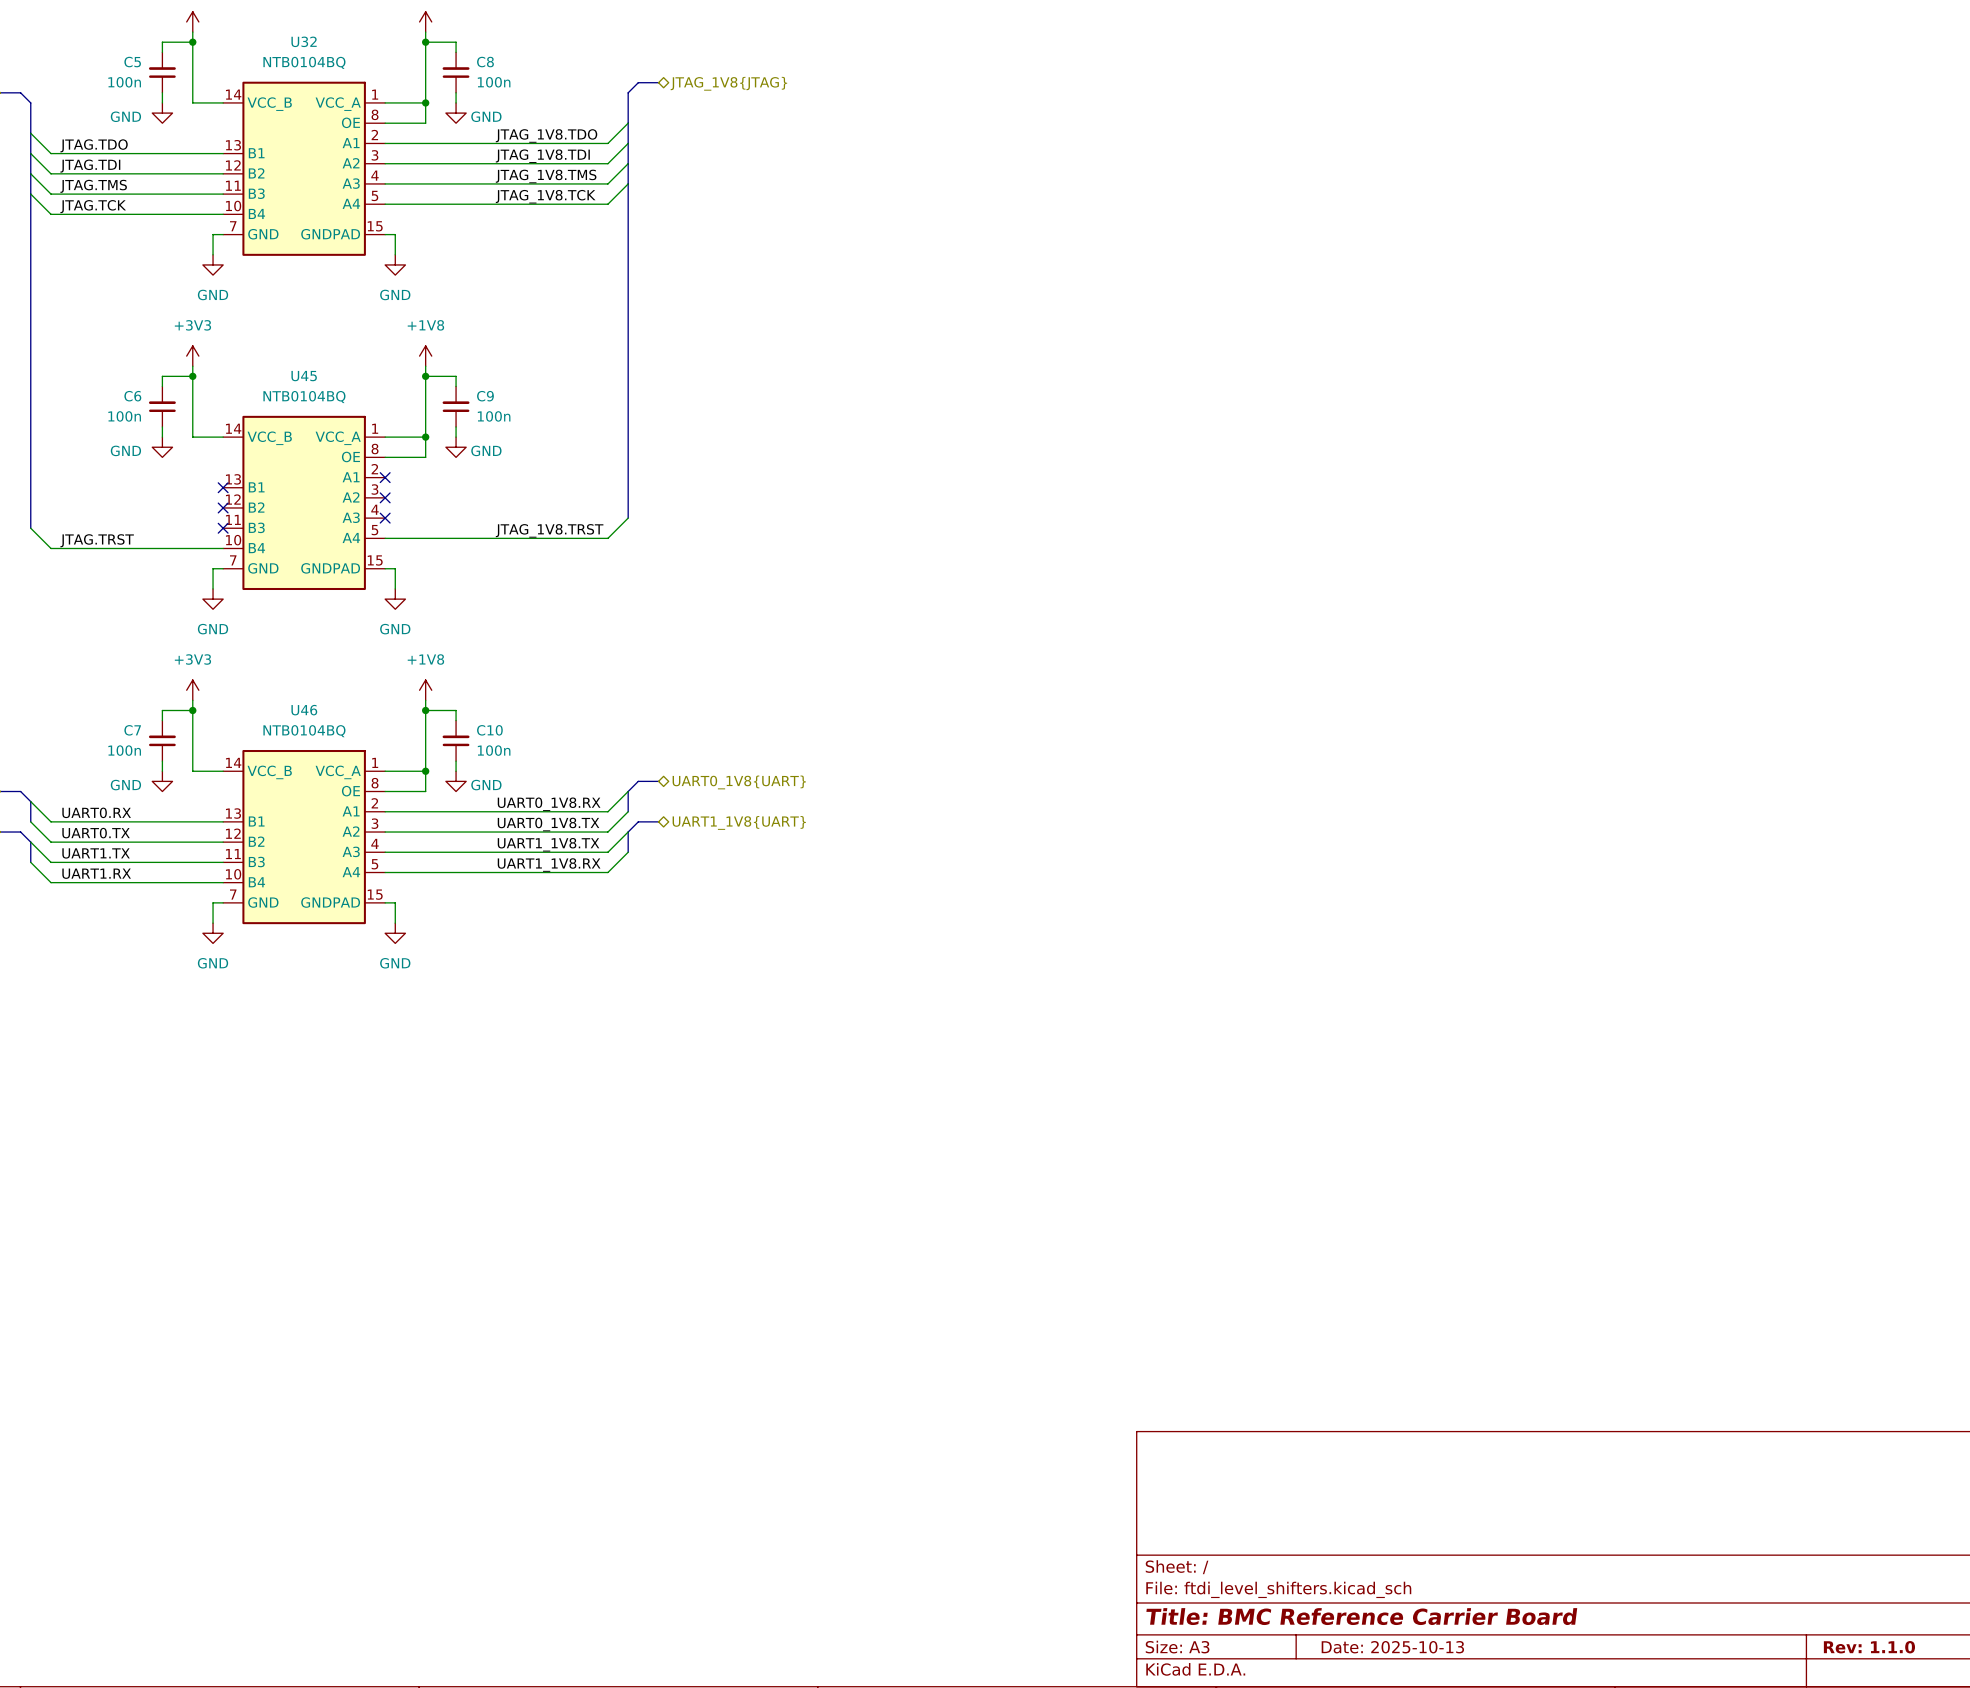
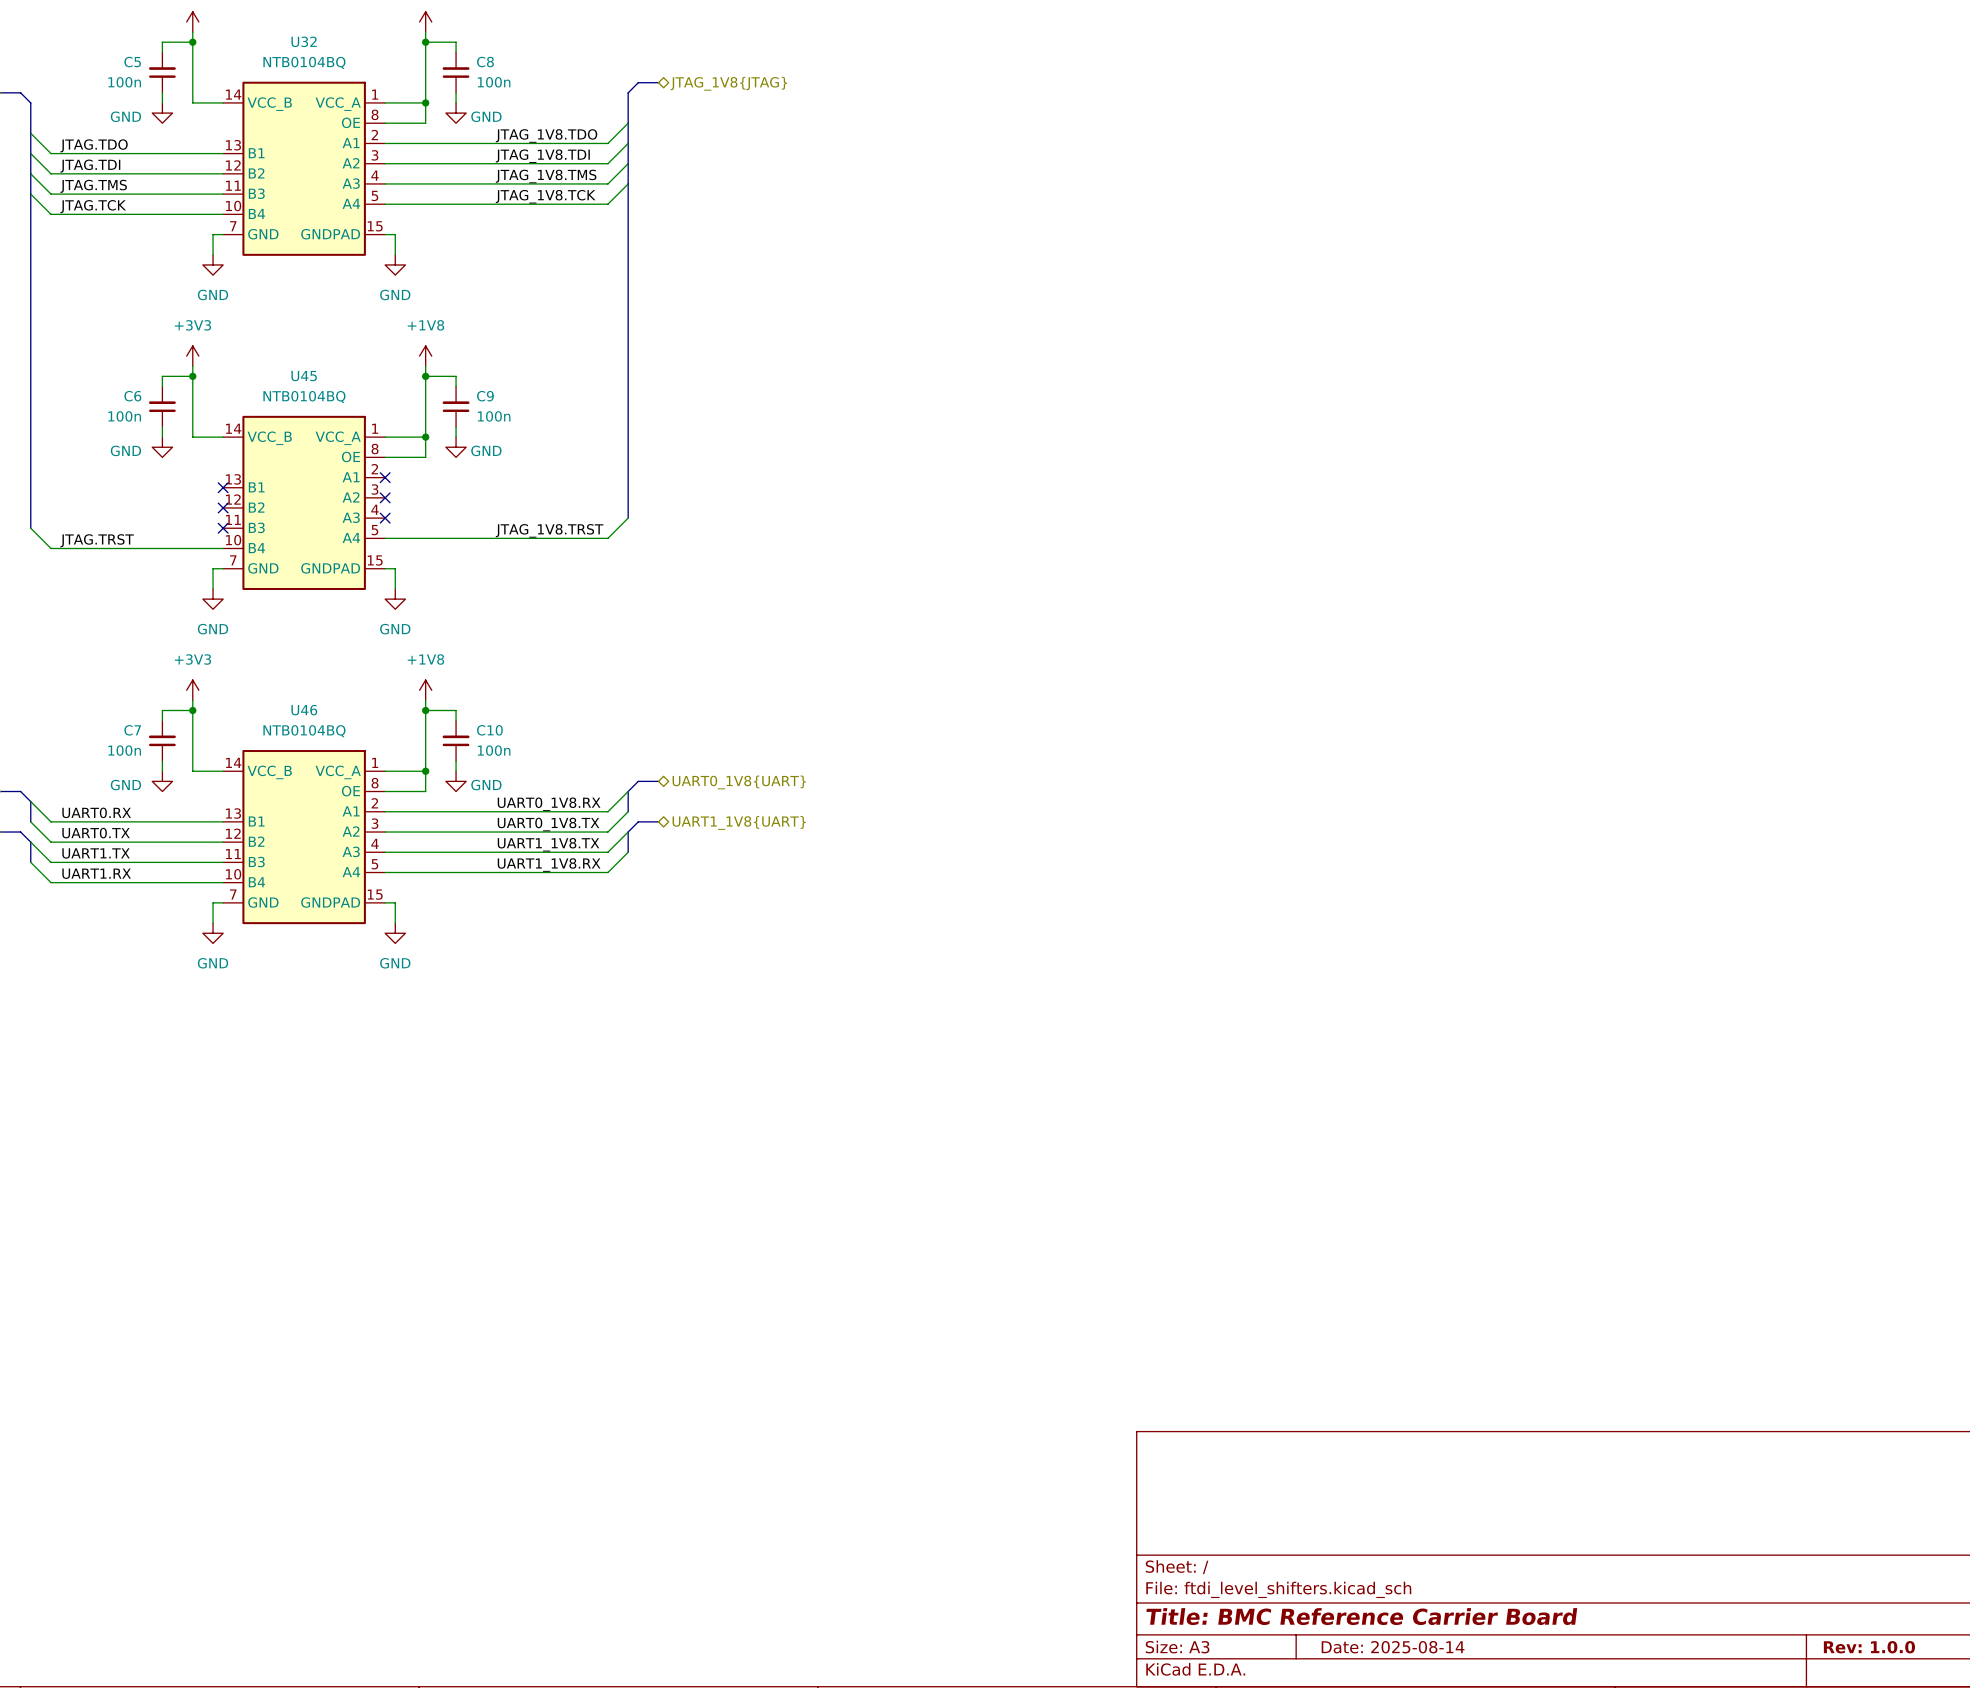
title block: Date: 2025-10-13 (1392, 1647) -> Date: 2025-08-14 (1393, 1647)
title block: Rev: 1.1.0 (1869, 1647) -> Rev: 1.0.0 (1869, 1647)

